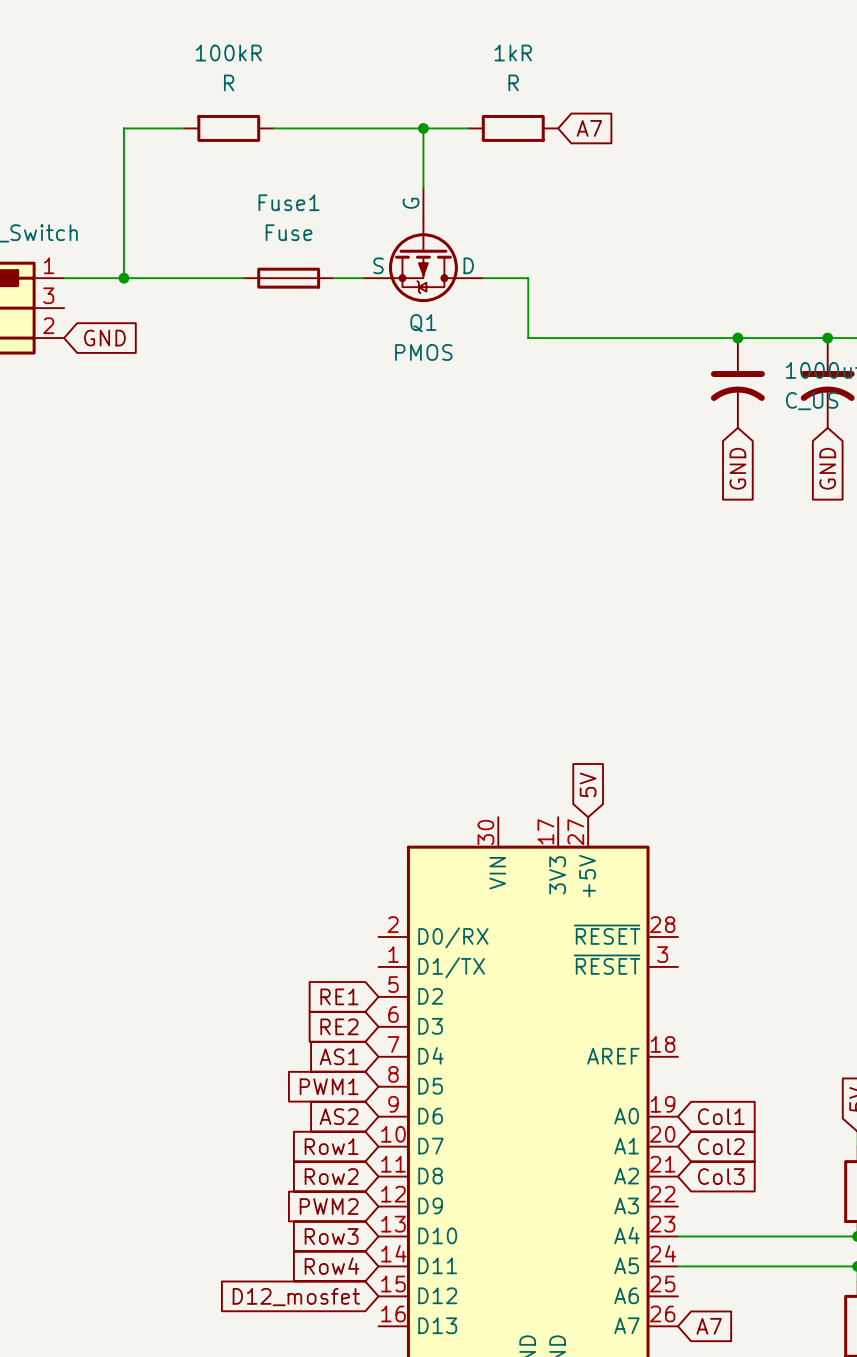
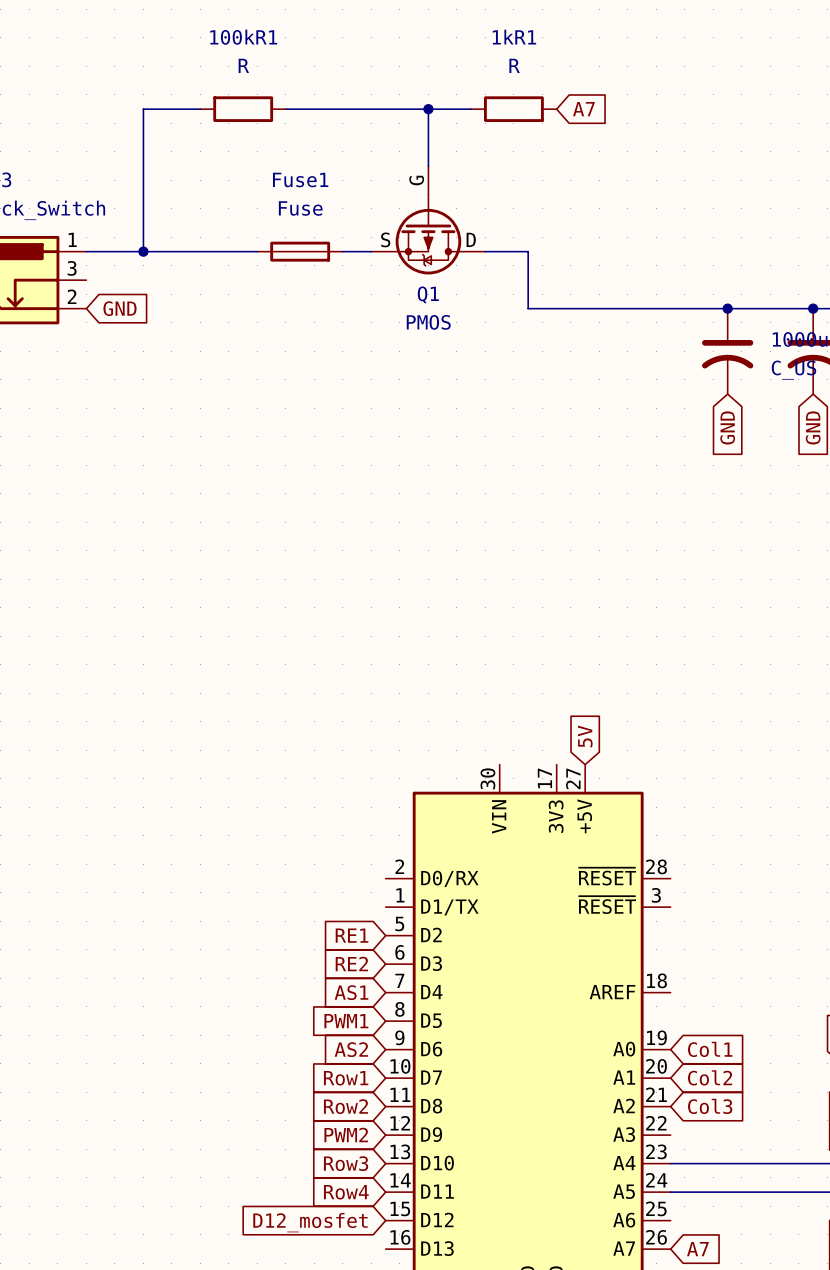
100kR name: 100kR (228, 53) -> 100kR1 (243, 37)
1kR name: 1kR (513, 53) -> 1kR1 (514, 37)

